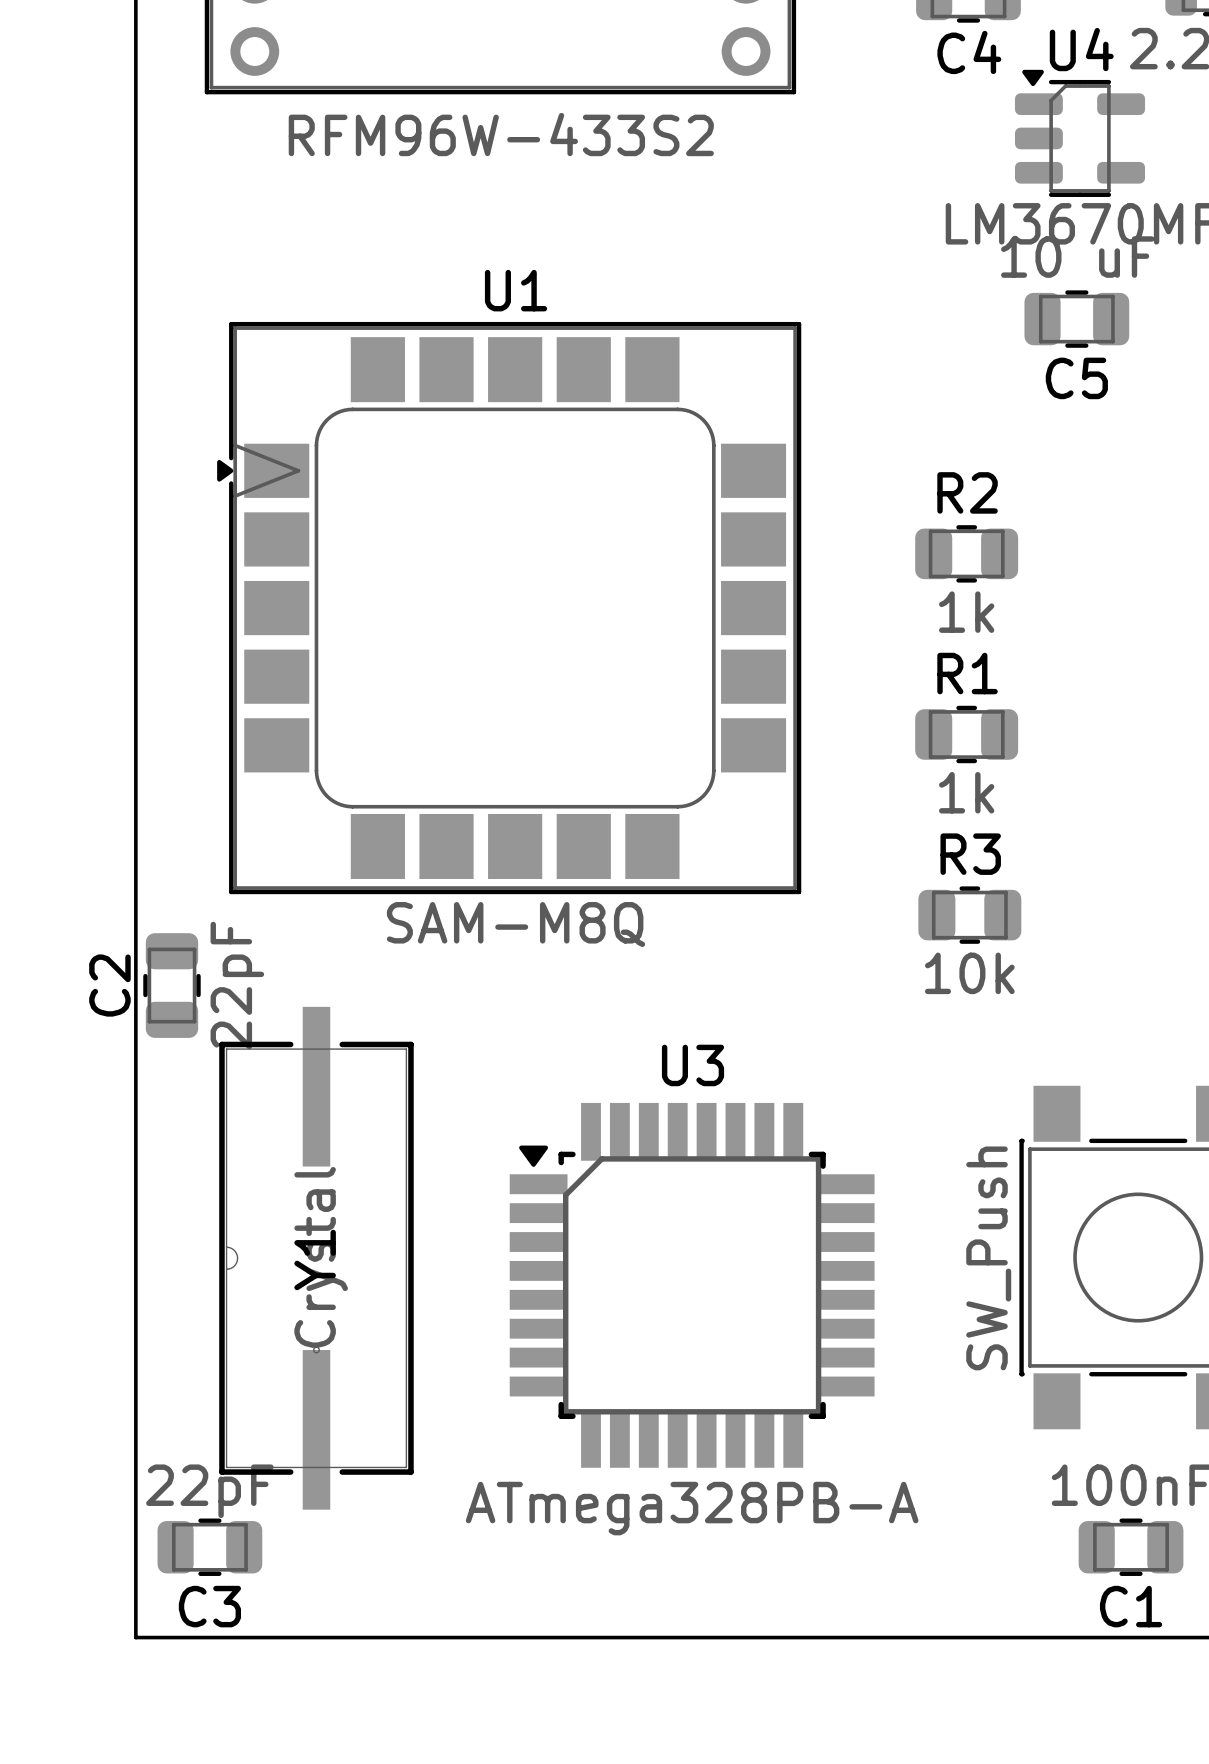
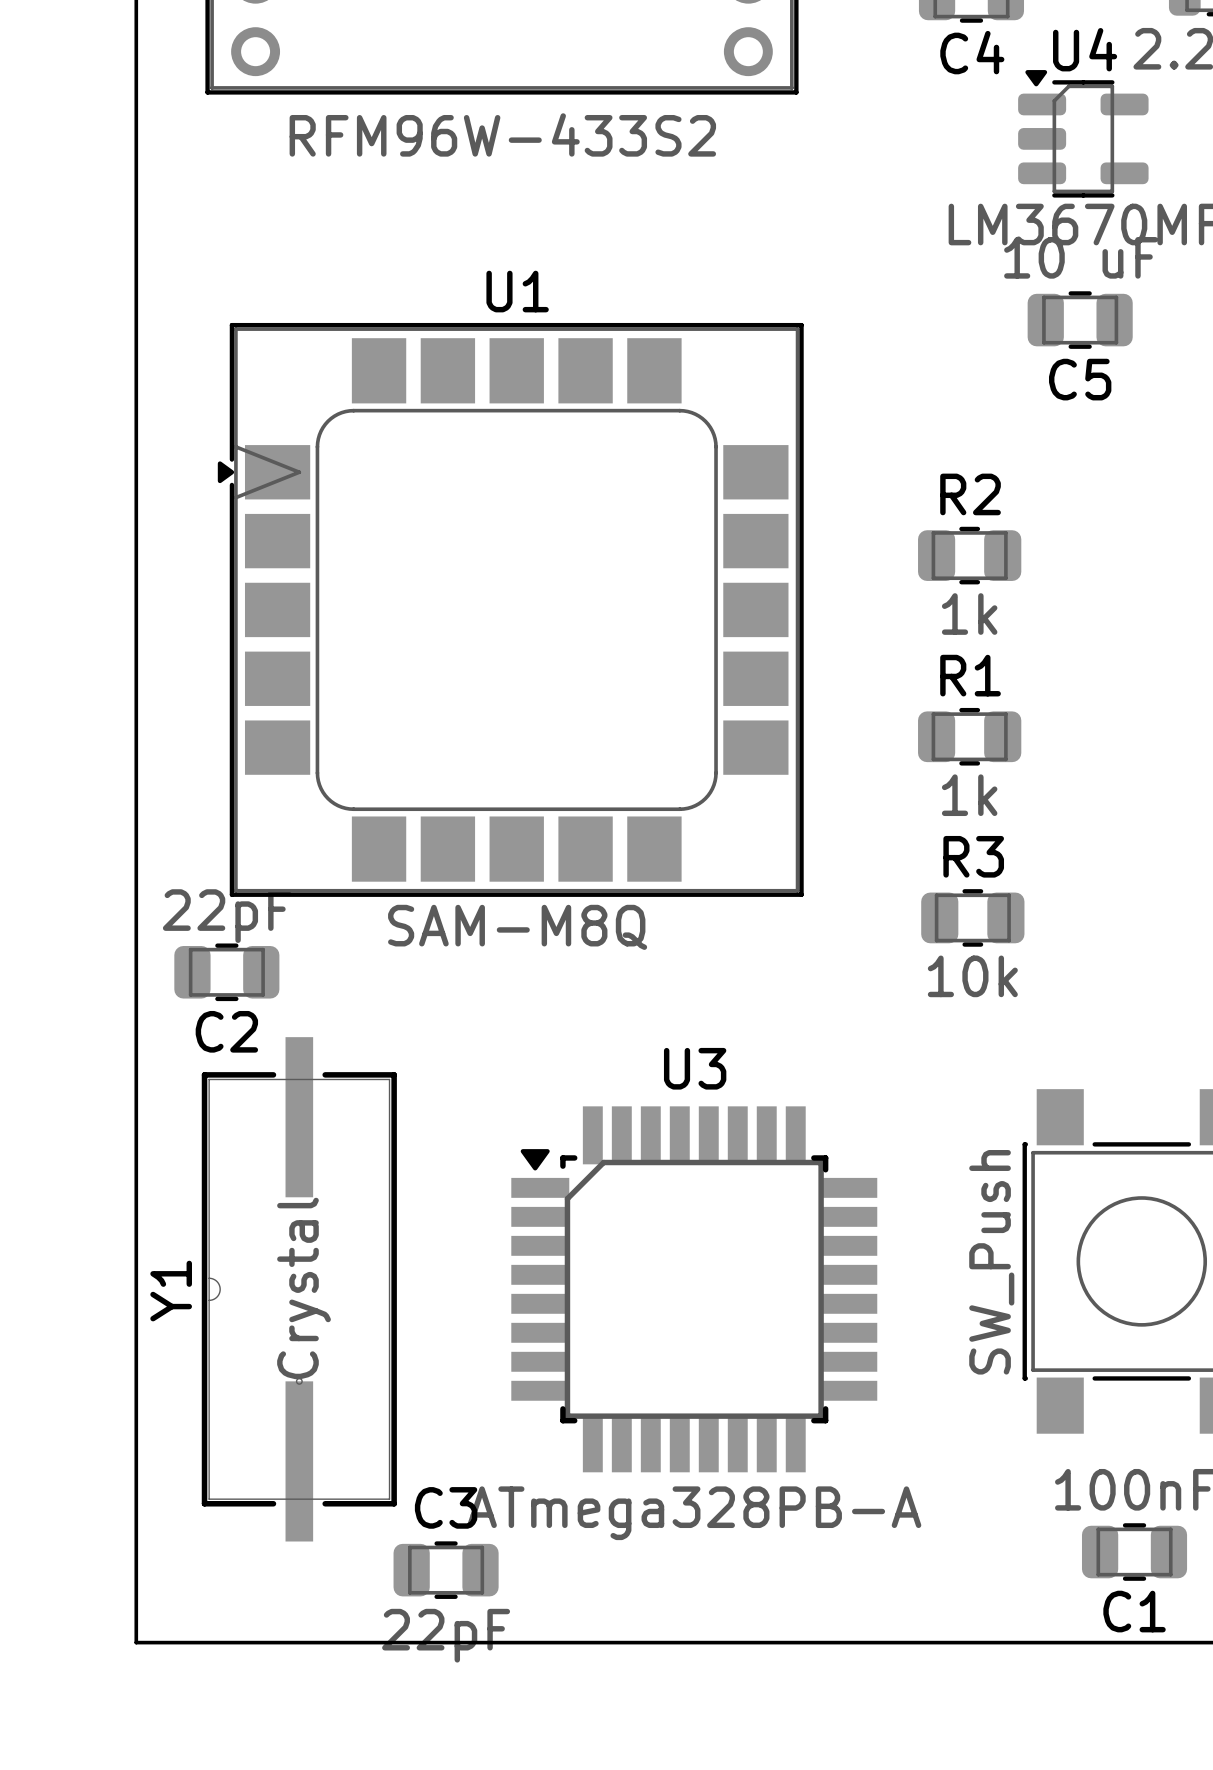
C2 name position: C2 (109, 985) -> C2 (226, 1031)
C2 rotation: 0° (171, 985) -> 90° clockwise (226, 972)
C2 value position: 22pF (237, 985) -> 22pF (226, 916)
Y1 position: (316, 1258) -> (299, 1289)
Y1 name position: Y1 (315, 1259) -> Y1 (171, 1291)
C3 value position: 22pF (209, 1491) -> 22pF (446, 1635)
C3 position: (209, 1547) -> (446, 1570)
C3 name position: C3 (209, 1606) -> C3 (446, 1507)

